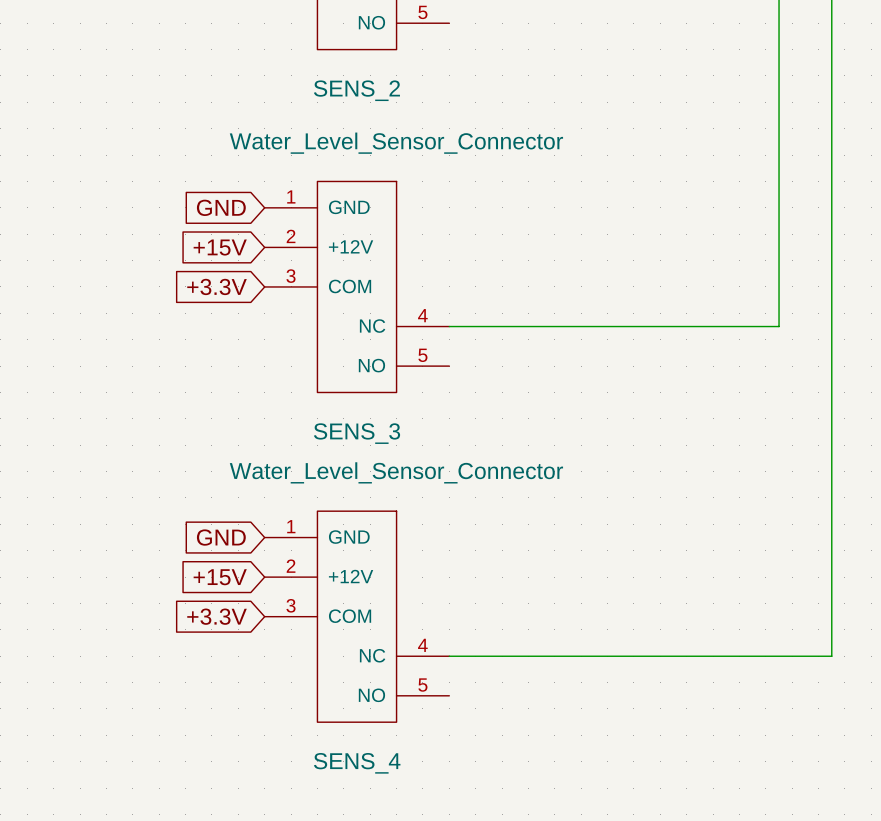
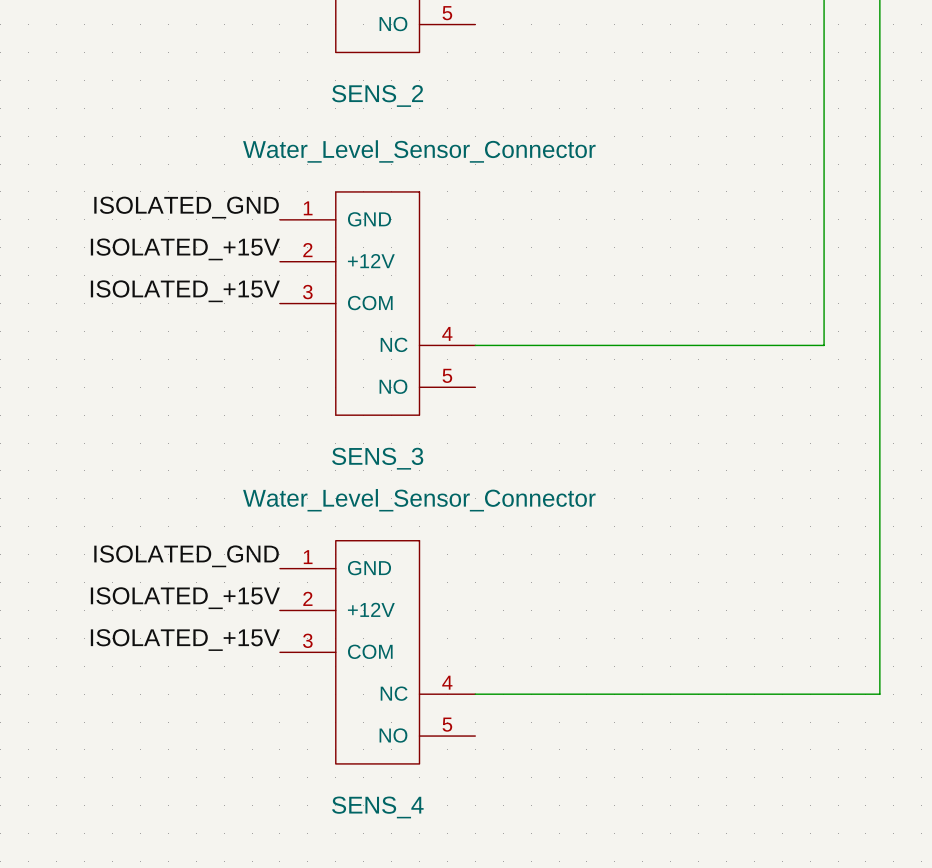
label: none -> ISOLATED_GND (186, 207)
global label: GND (221, 207) -> none
label: none -> ISOLATED_+15V (185, 249)
global label: +15V (220, 247) -> none
label: none -> ISOLATED_+15V (185, 291)
global label: +3.3V (217, 286) -> none
label: none -> ISOLATED_GND (186, 556)
global label: GND (221, 537) -> none
label: none -> ISOLATED_+15V (185, 598)
global label: +15V (220, 577) -> none
label: none -> ISOLATED_+15V (185, 640)
global label: +3.3V (217, 616) -> none

